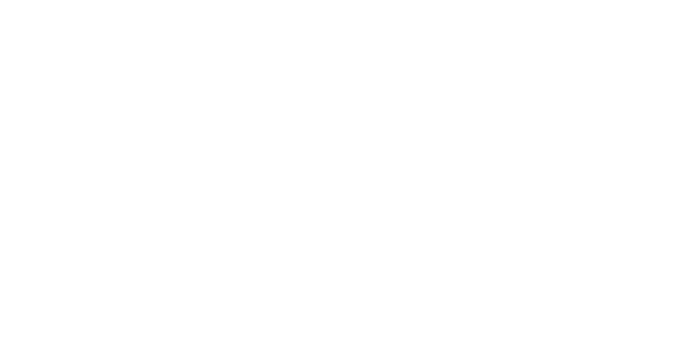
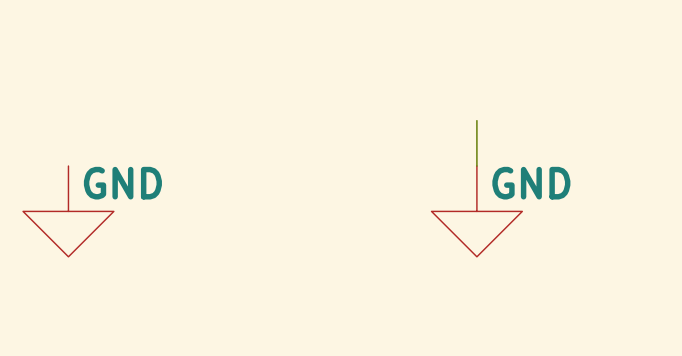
wire: none -> (476, 120) (476, 166)
power symbol: none -> GND (68, 211)
power symbol: none -> GND (476, 211)

